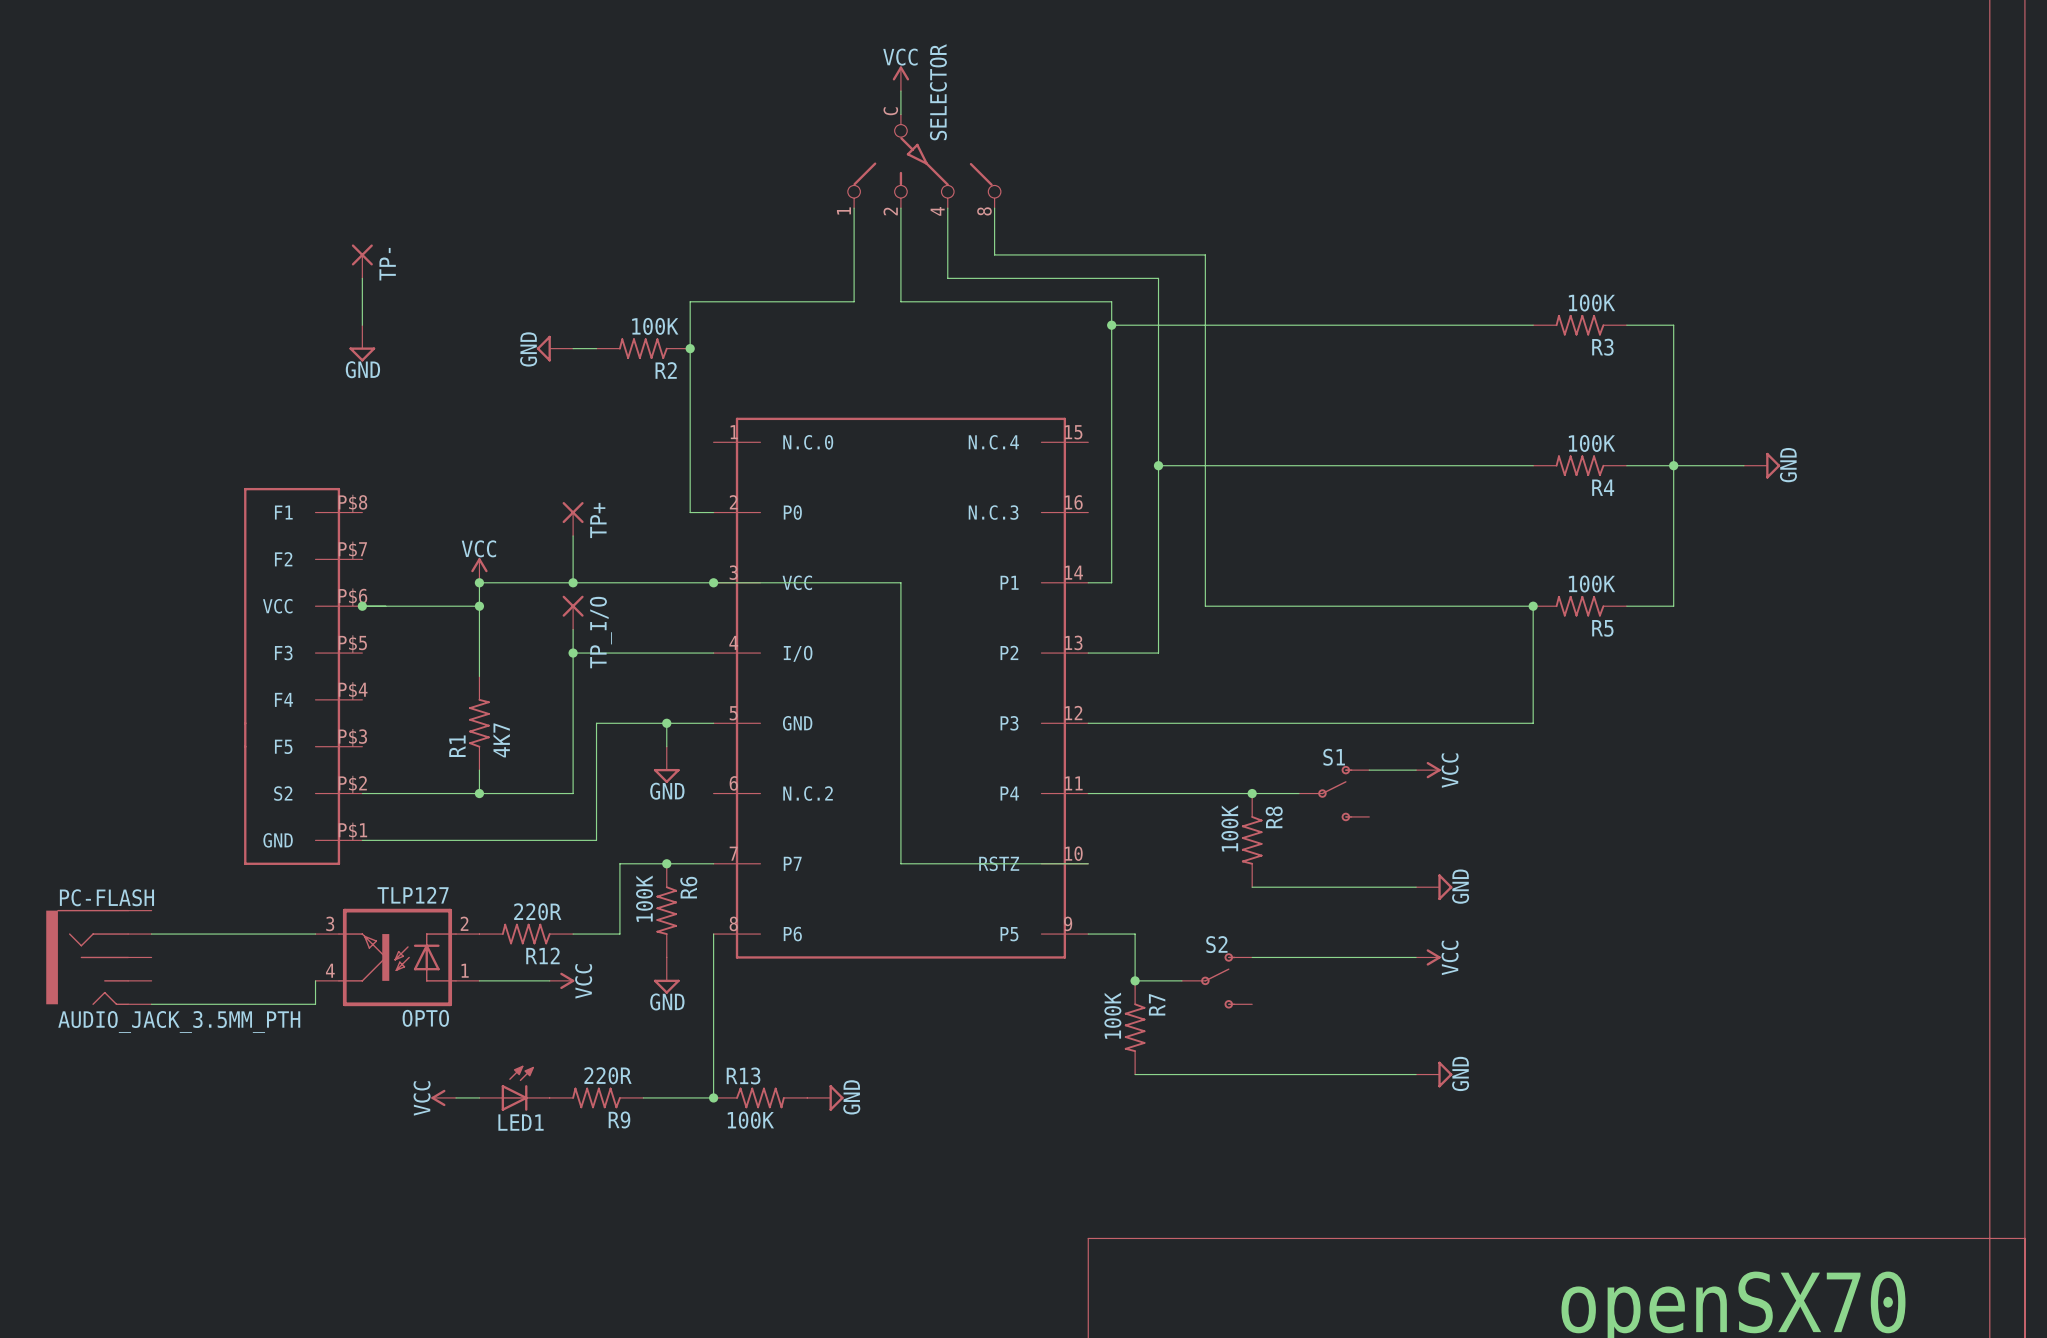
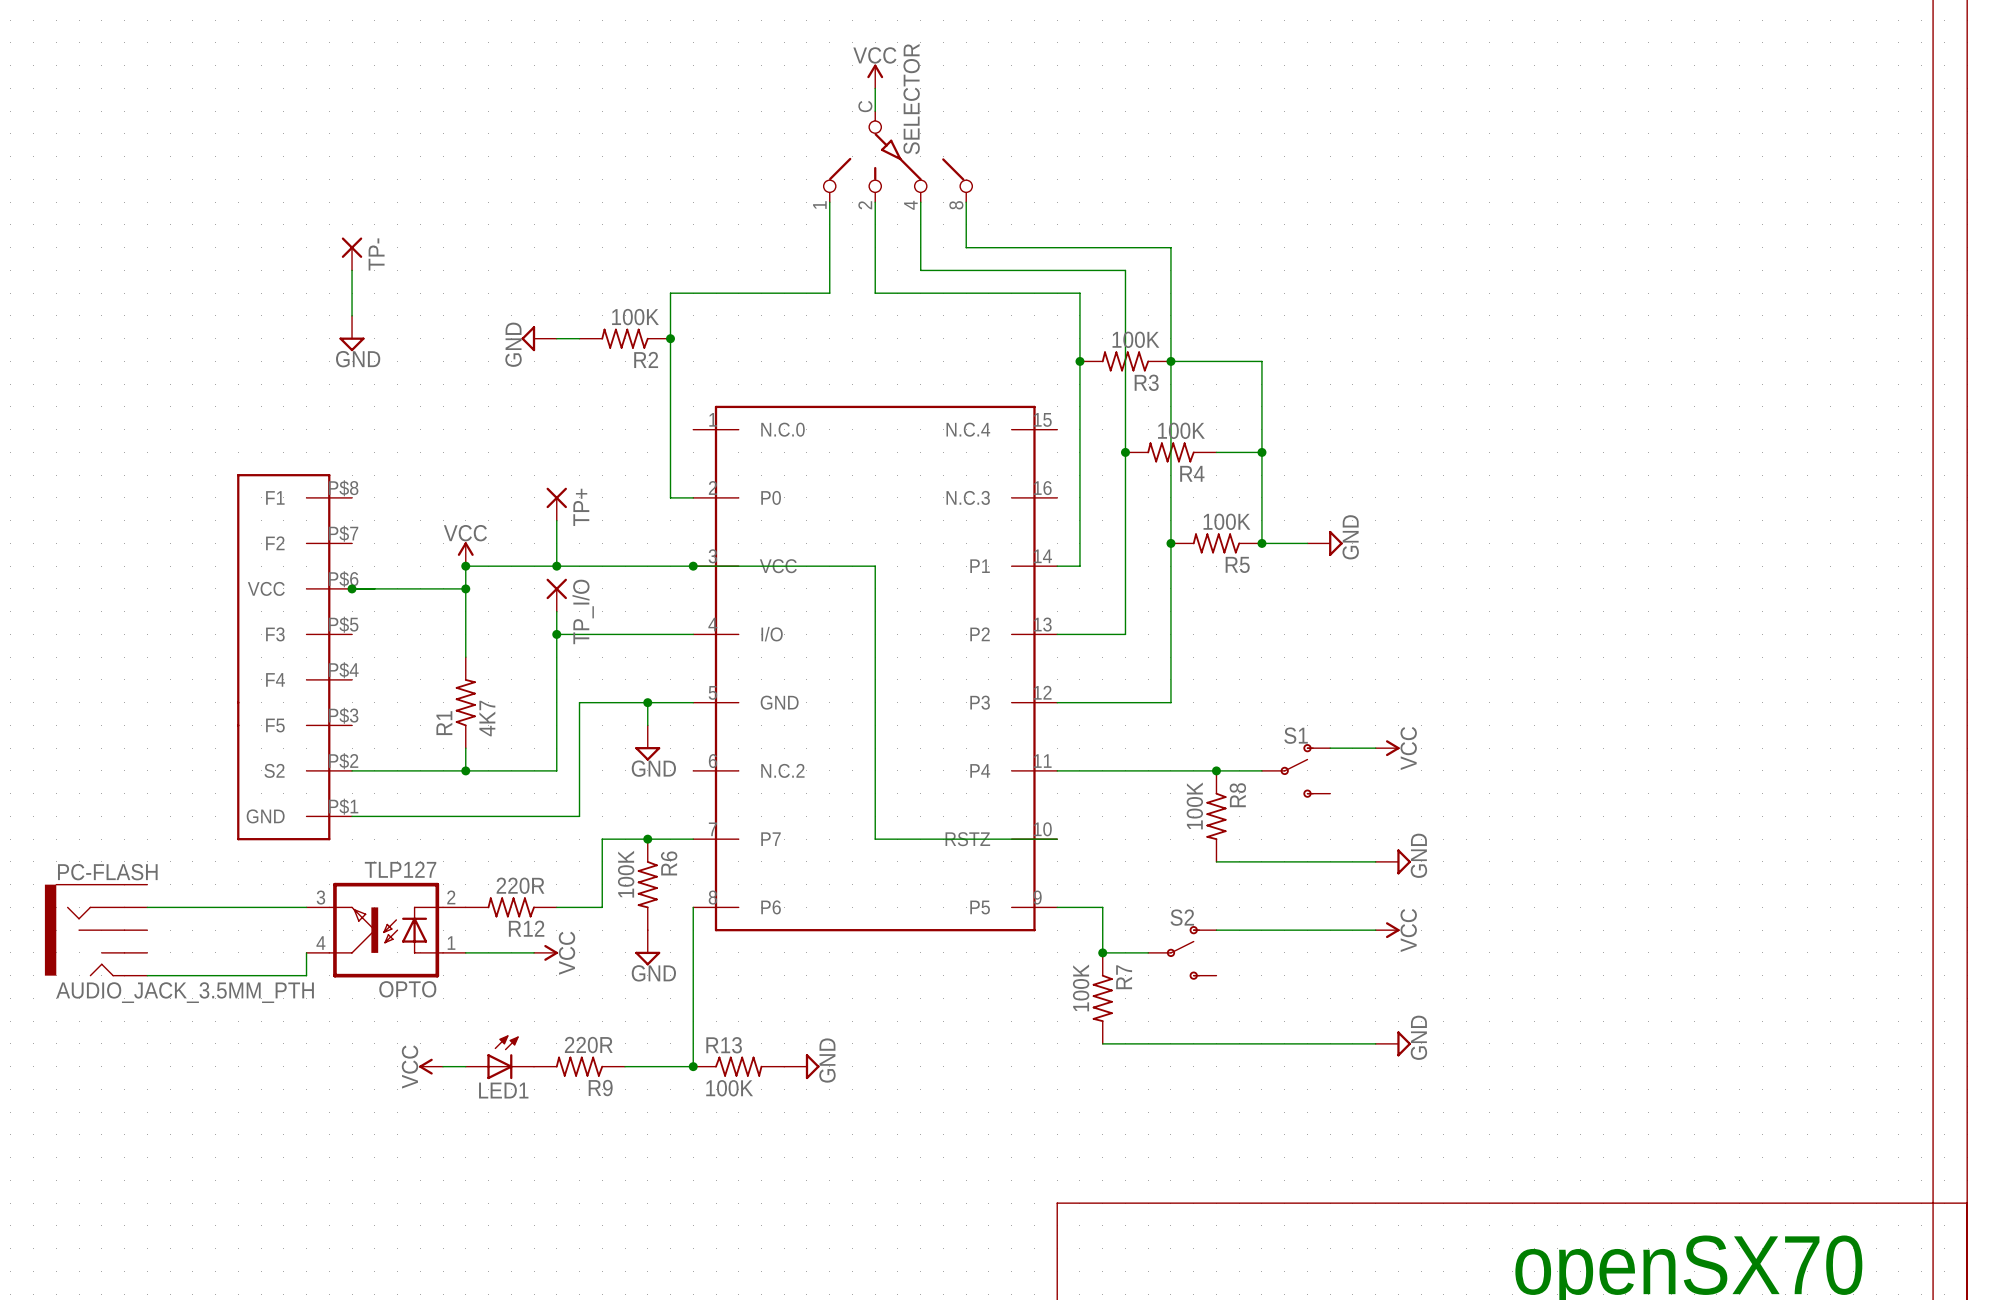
wire: (1111, 325) (1533, 325) -> none
junction position: (1111, 325) -> (1079, 361)
R3 position: (1580, 325) -> (1125, 361)
wire: (1626, 325) (1673, 325) (1673, 606) (1626, 606) -> none
wire: none -> (1170, 361) (1261, 361) (1261, 543) (1307, 543)
junction: none -> (1170, 361)
wire: (1299, 465) (1533, 465) -> none
junction: none -> (1261, 452)
R4 position: (1580, 465) -> (1170, 452)
wire: (1626, 465) (1743, 465) -> none
junction: (1673, 465) -> none
power symbol: GND (1762, 465) -> none
junction: none -> (1170, 543)
junction: none -> (1261, 543)
power symbol: none -> GND (1325, 543)
wire: (1205, 606) (1533, 606) (1533, 723) (1205, 723) -> (1170, 588) (1170, 702)
junction: (1533, 606) -> none
R5 position: (1580, 606) -> (1216, 543)

